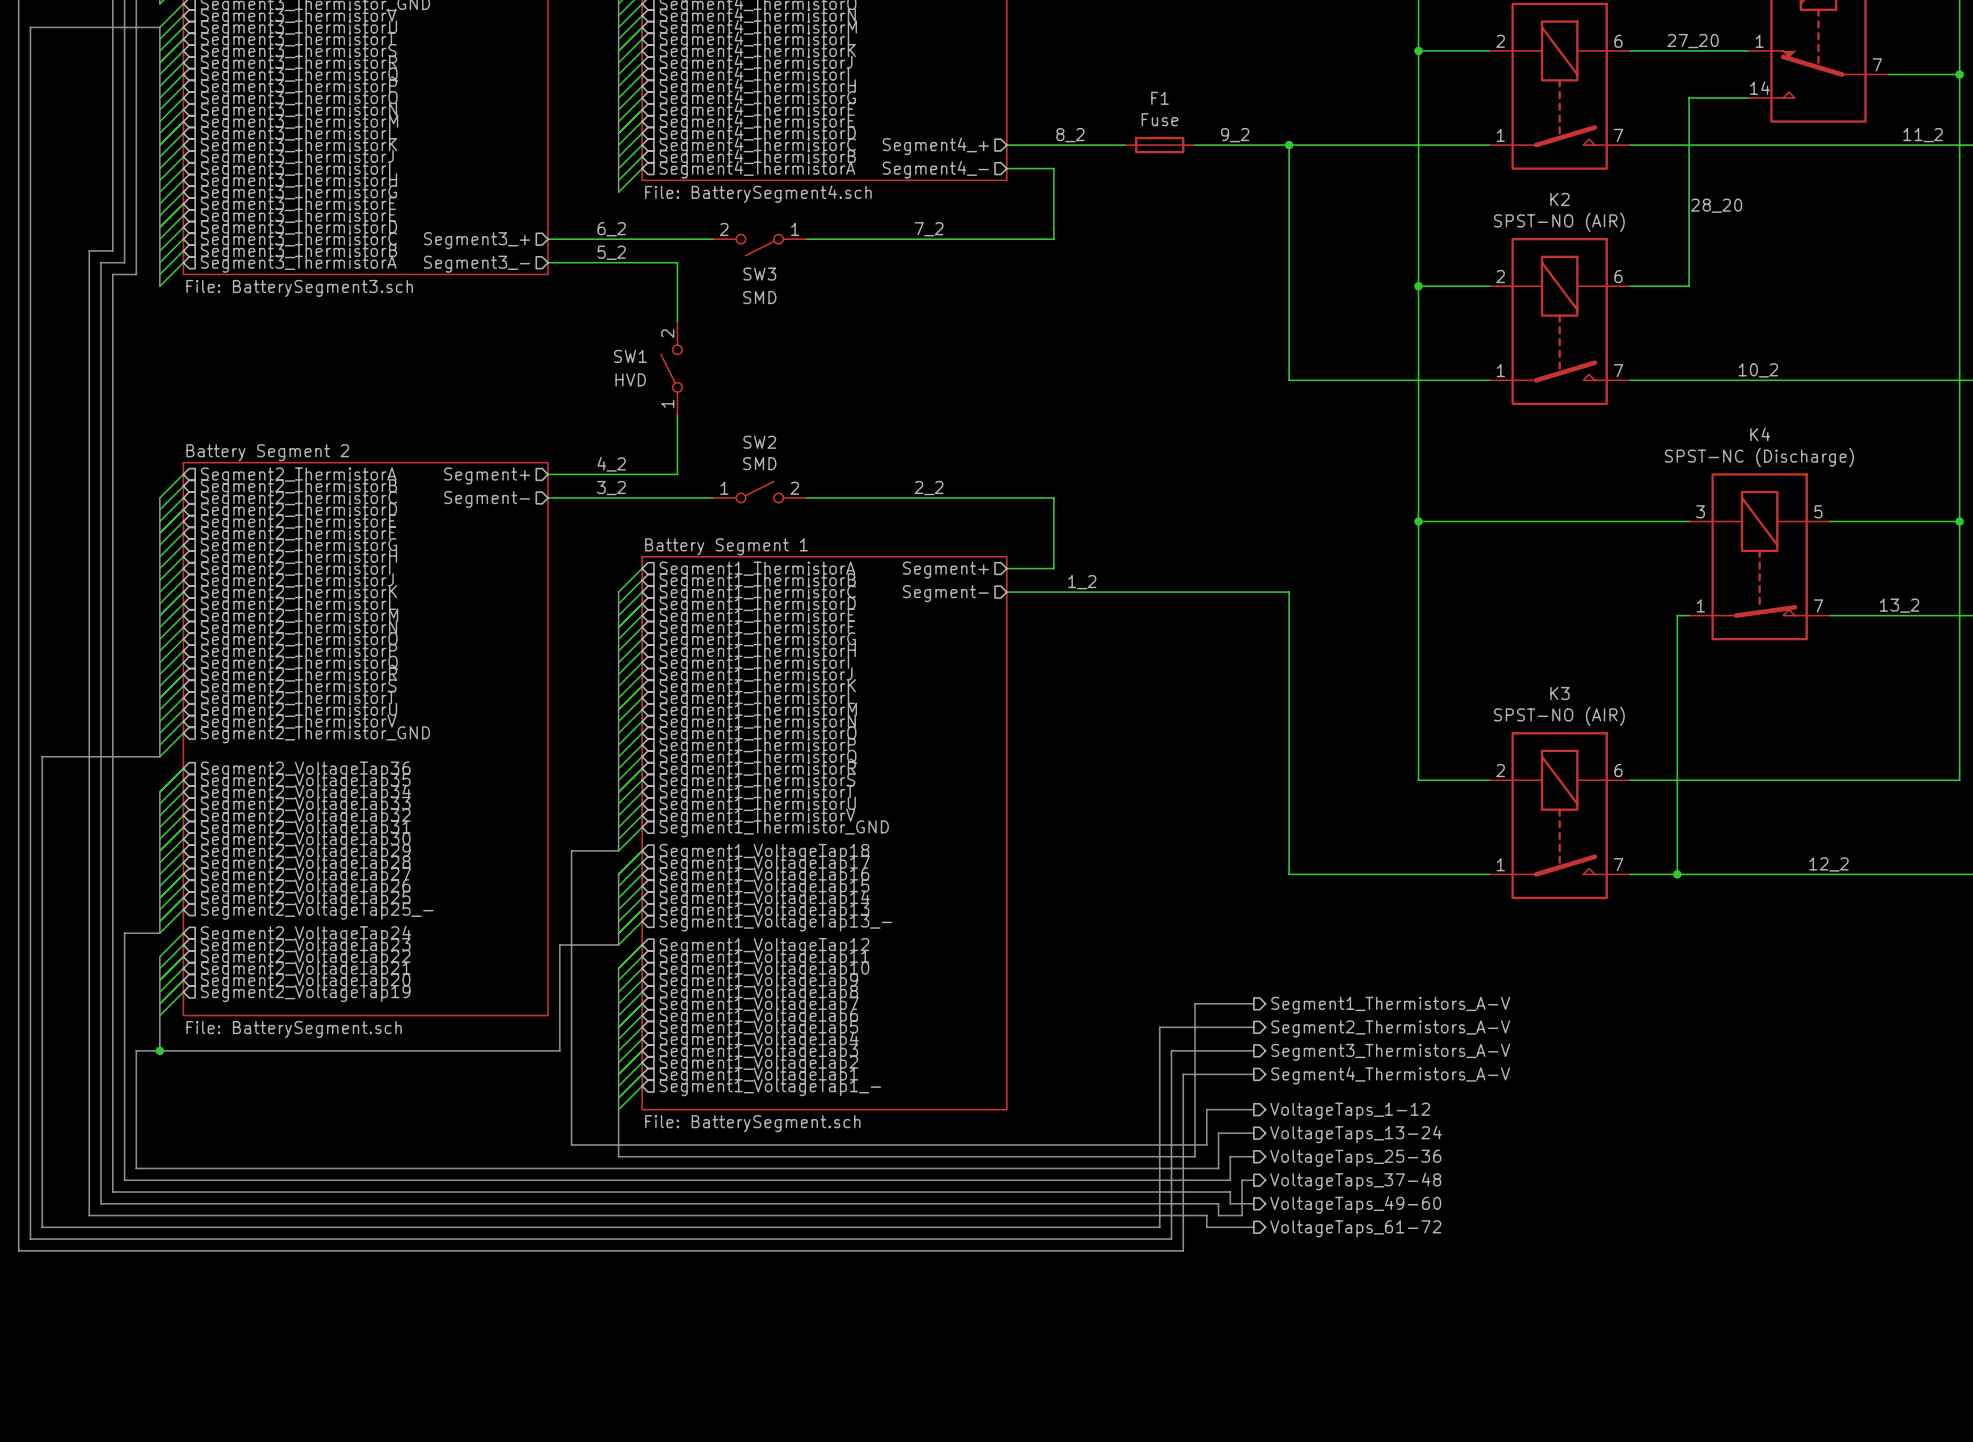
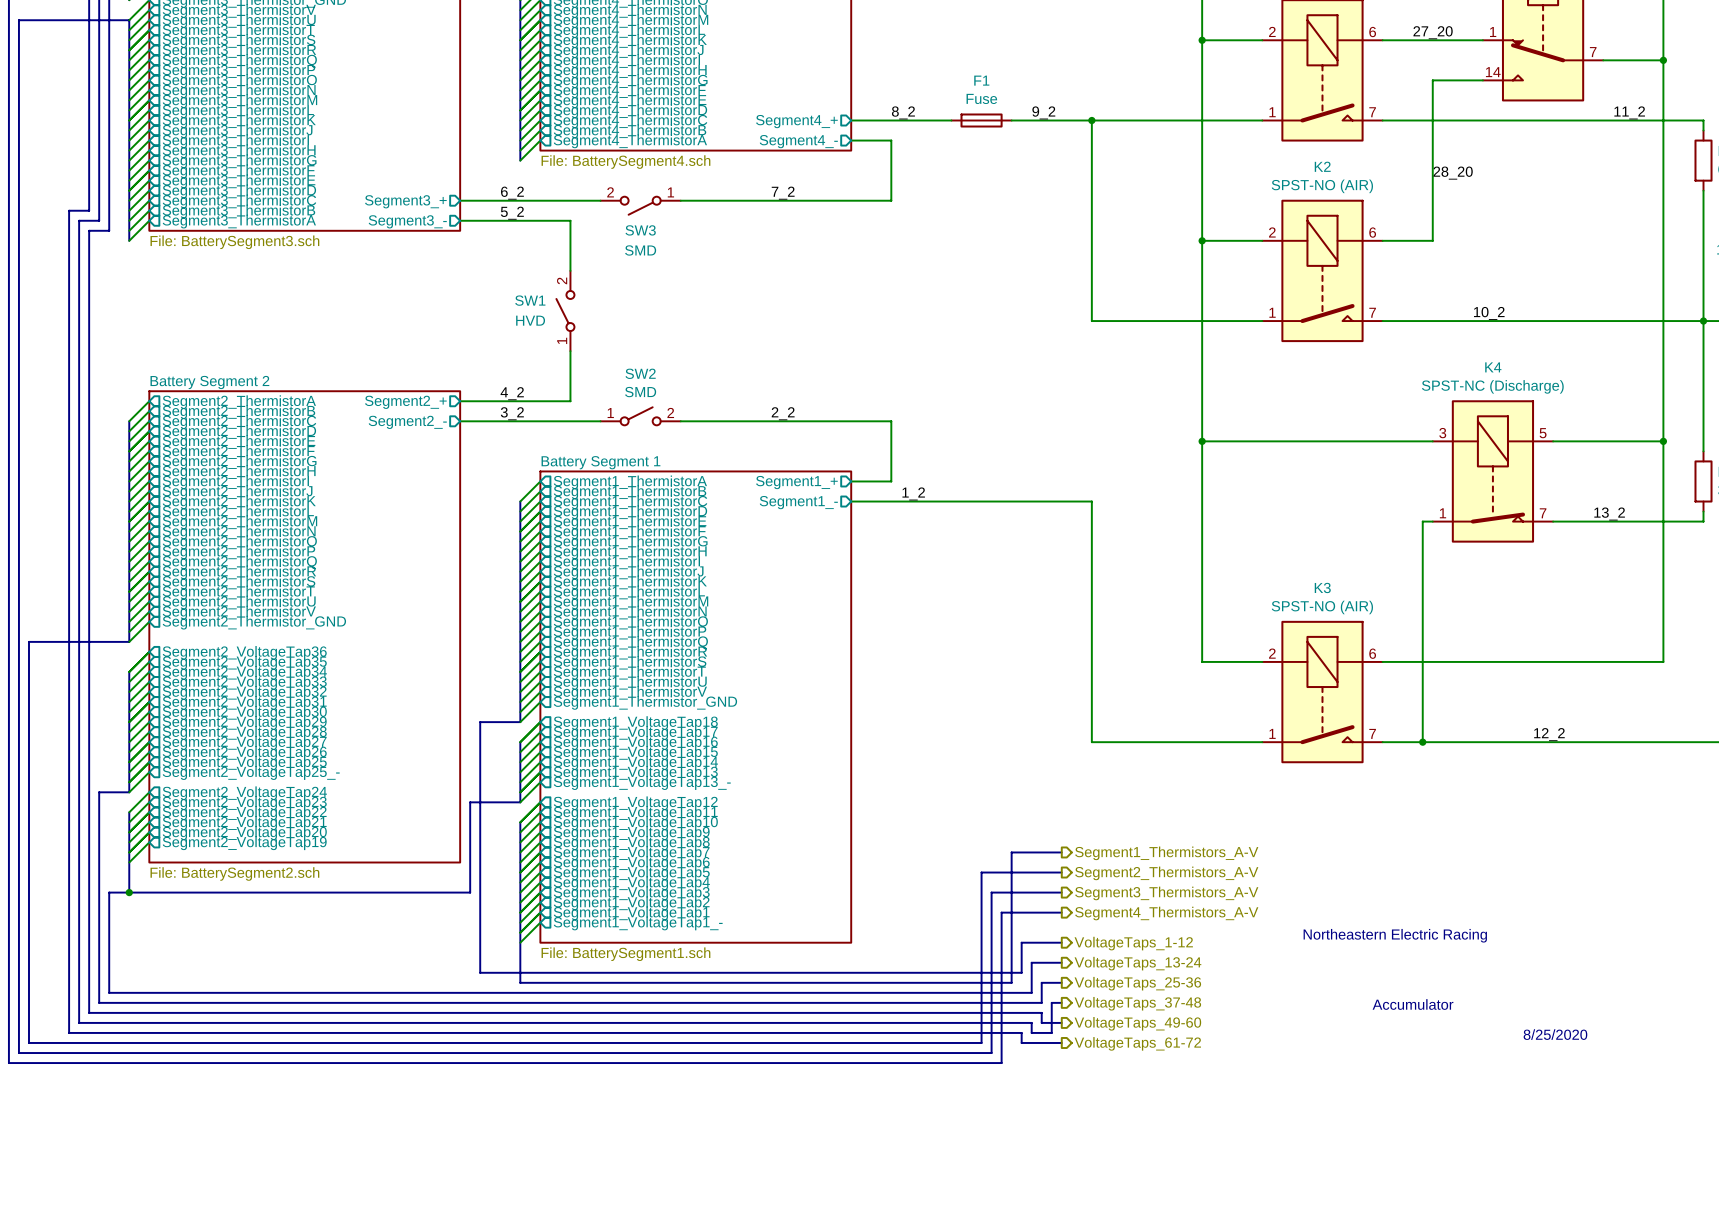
sheet pin: Segment+ (487, 475) -> Segment2_+ (405, 402)
sheet pin: Segment- (487, 499) -> Segment2_- (407, 422)
sheet pin: Segment+ (945, 570) -> Segment1_+ (796, 482)
sheet pin: Segment- (945, 593) -> Segment1_- (798, 502)
sheet Battery Segment 2 value: File: BatterySegment.sch (294, 1029) -> File: BatterySegment2.sch (234, 873)
text: none -> Northeastern Electric Racing (1395, 935)
sheet Battery Segment 1 value: File: BatterySegment.sch (752, 1123) -> File: BatterySegment1.sch (625, 954)
text: none -> Accumulator (1413, 1004)
text: none -> 8/25/2020 (1555, 1034)

